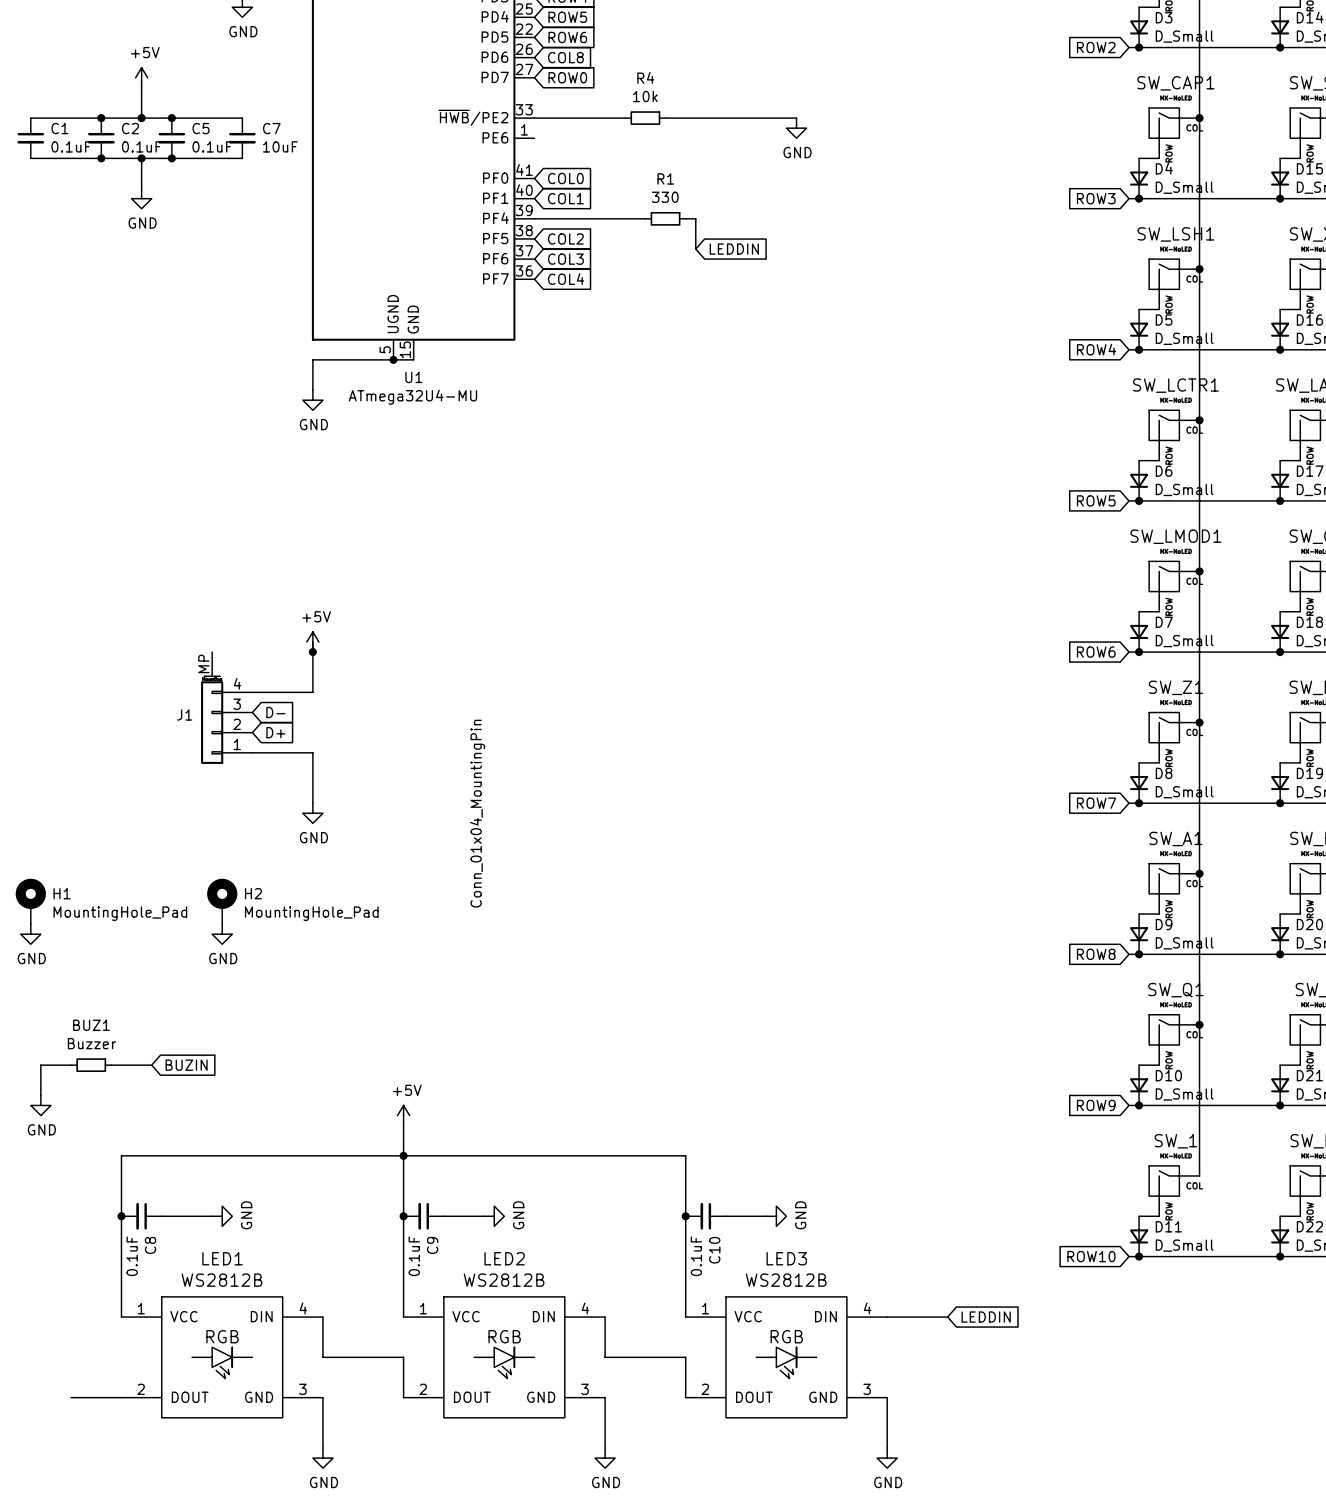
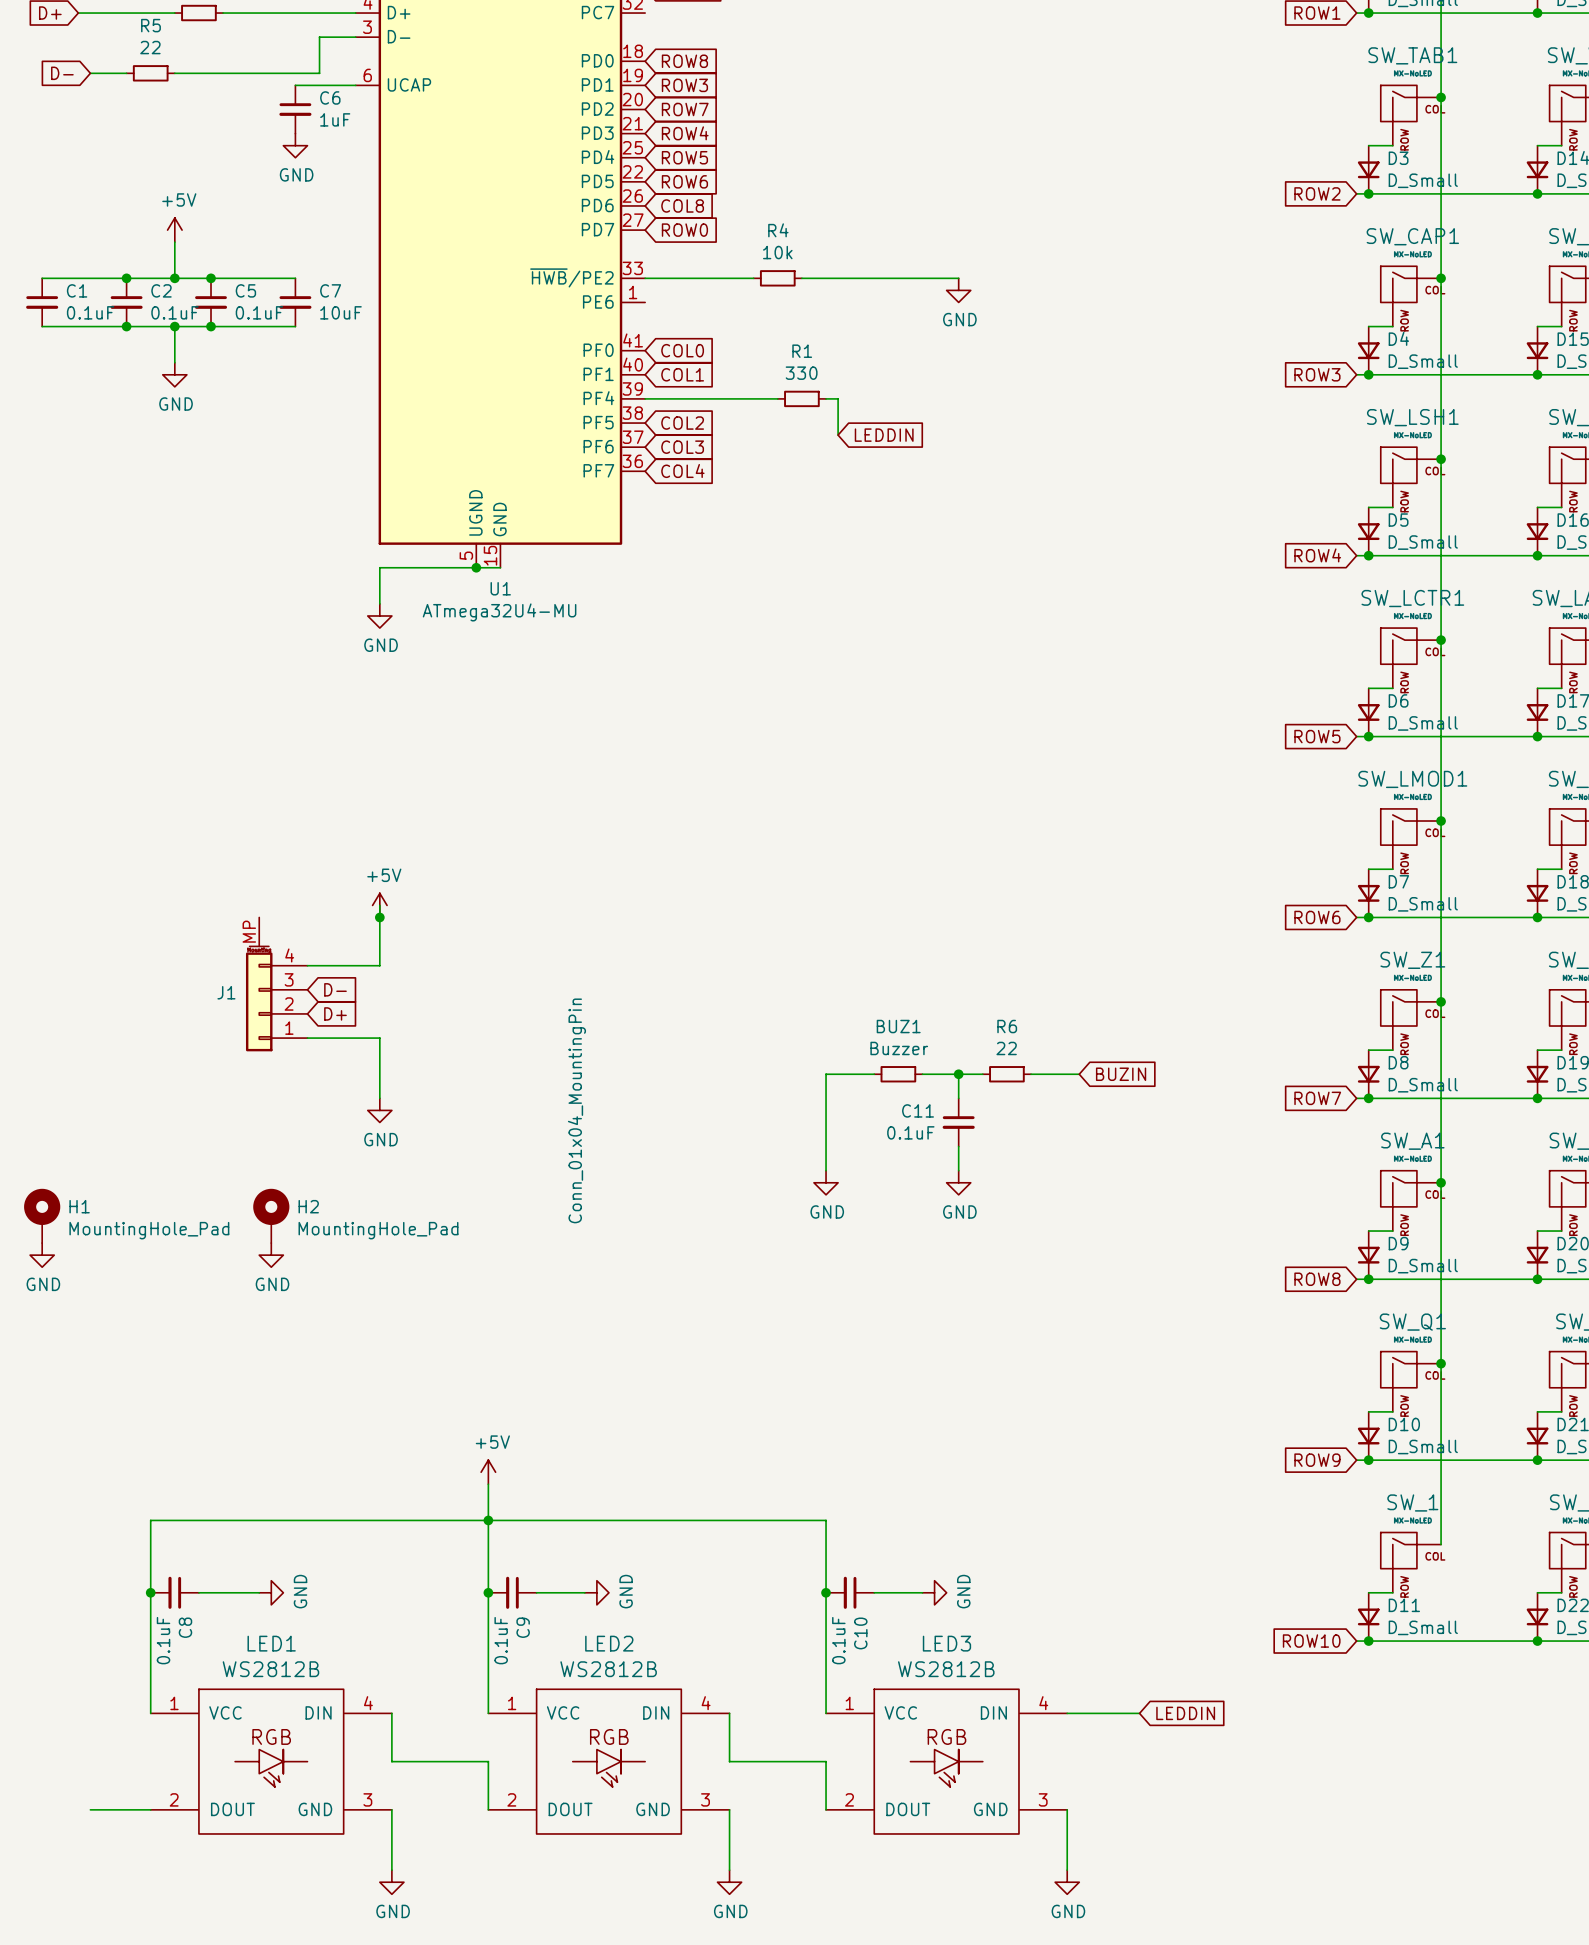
wire: none -> (874, 1074) (826, 1074) (826, 1170)
wire: none -> (922, 1074) (982, 1074)
wire: none -> (958, 1074) (958, 1098)
junction: none -> (958, 1074)
R6: none -> 22 (1006, 1074)
wire: none -> (1031, 1074) (1079, 1074)
global label: none -> BUZIN (1121, 1074)
C11: none -> 0.1uF (958, 1122)
wire: none -> (958, 1146) (958, 1170)
power symbol: none -> GND (826, 1182)
power symbol: none -> GND (958, 1182)
wire: (71, 1065) (40, 1065) (40, 1095) -> none
BUZ1 position: (91, 1065) -> (898, 1074)
wire: (111, 1065) (151, 1065) -> none
global label: BUZIN (186, 1065) -> none
power symbol: GND (40, 1105) -> none

